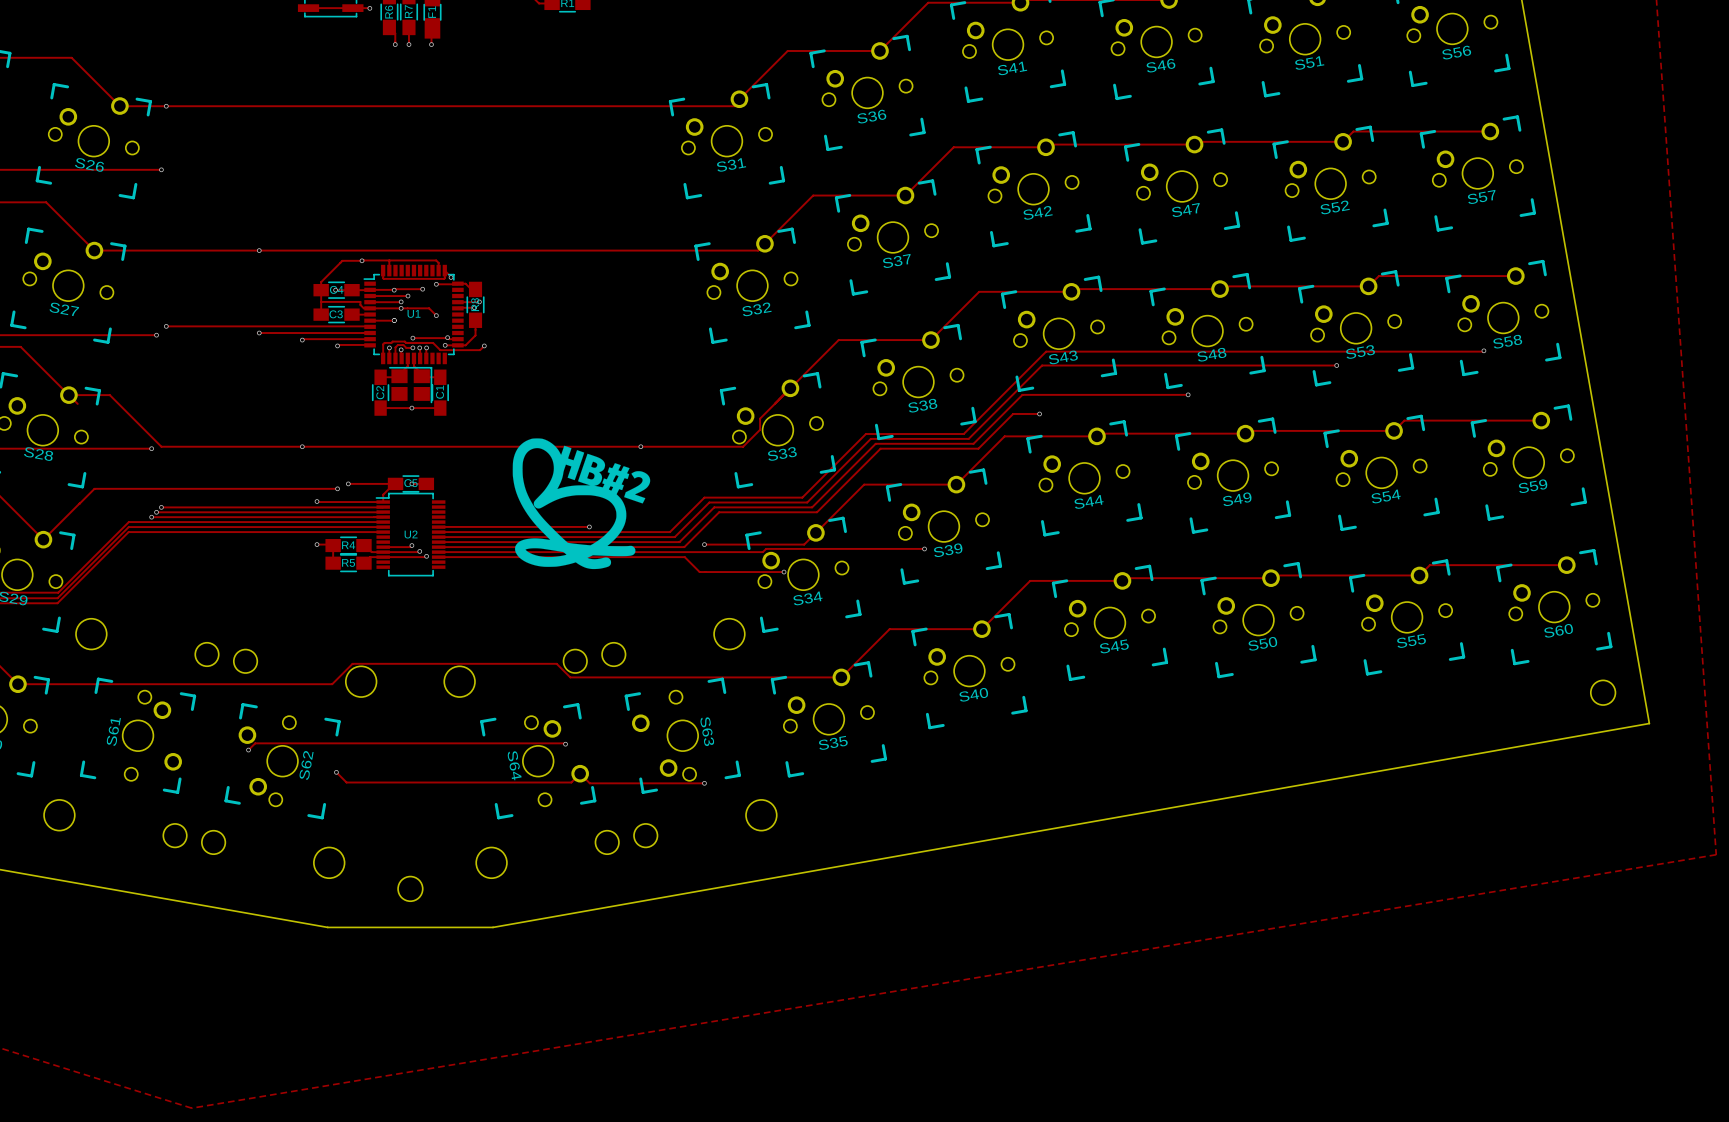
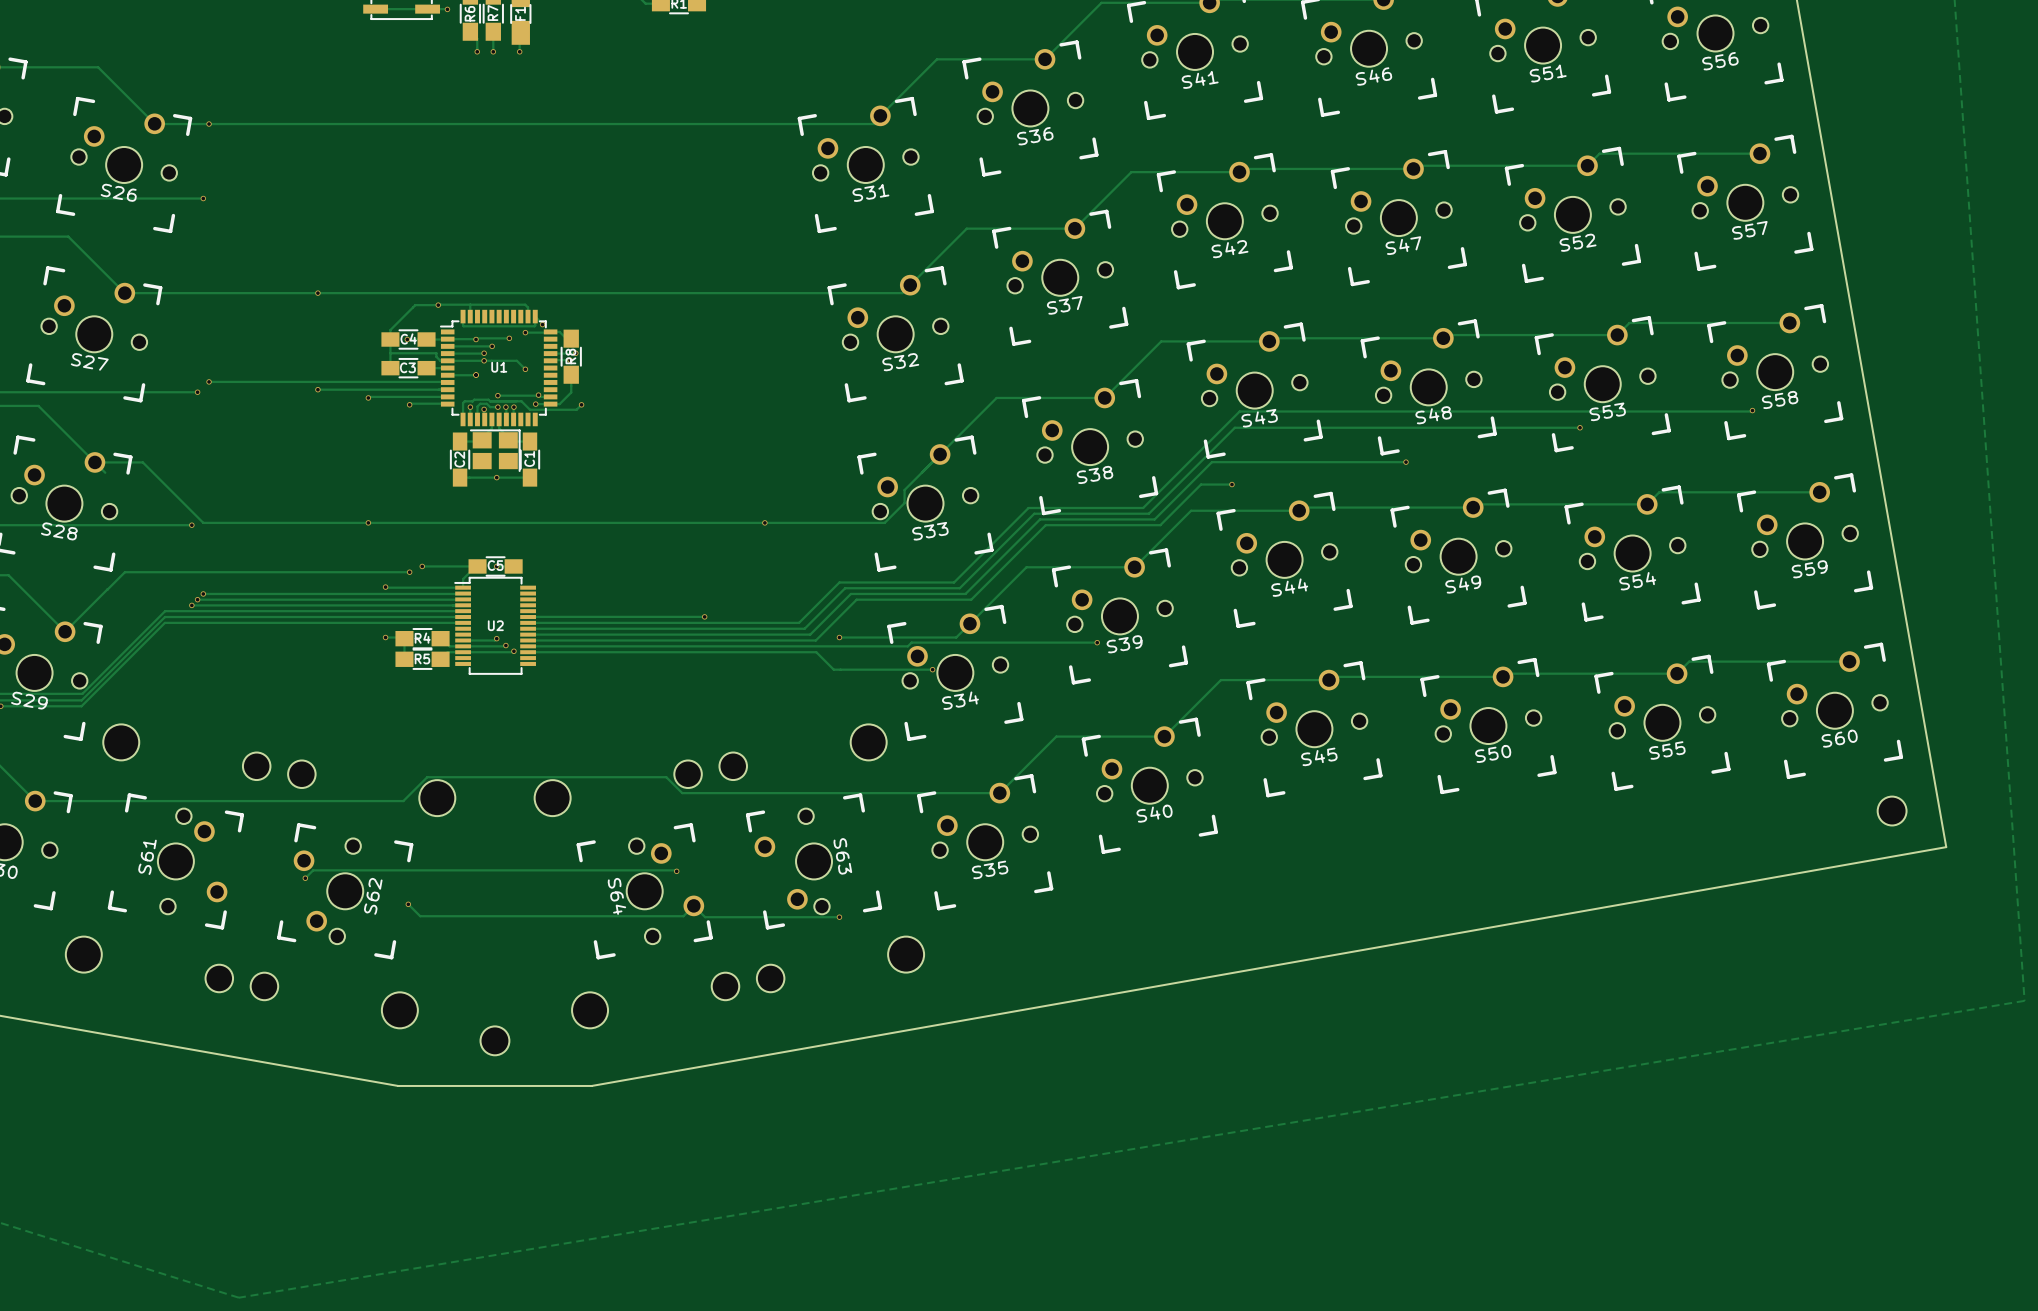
drawing: [512, 438, 651, 570] -> none

